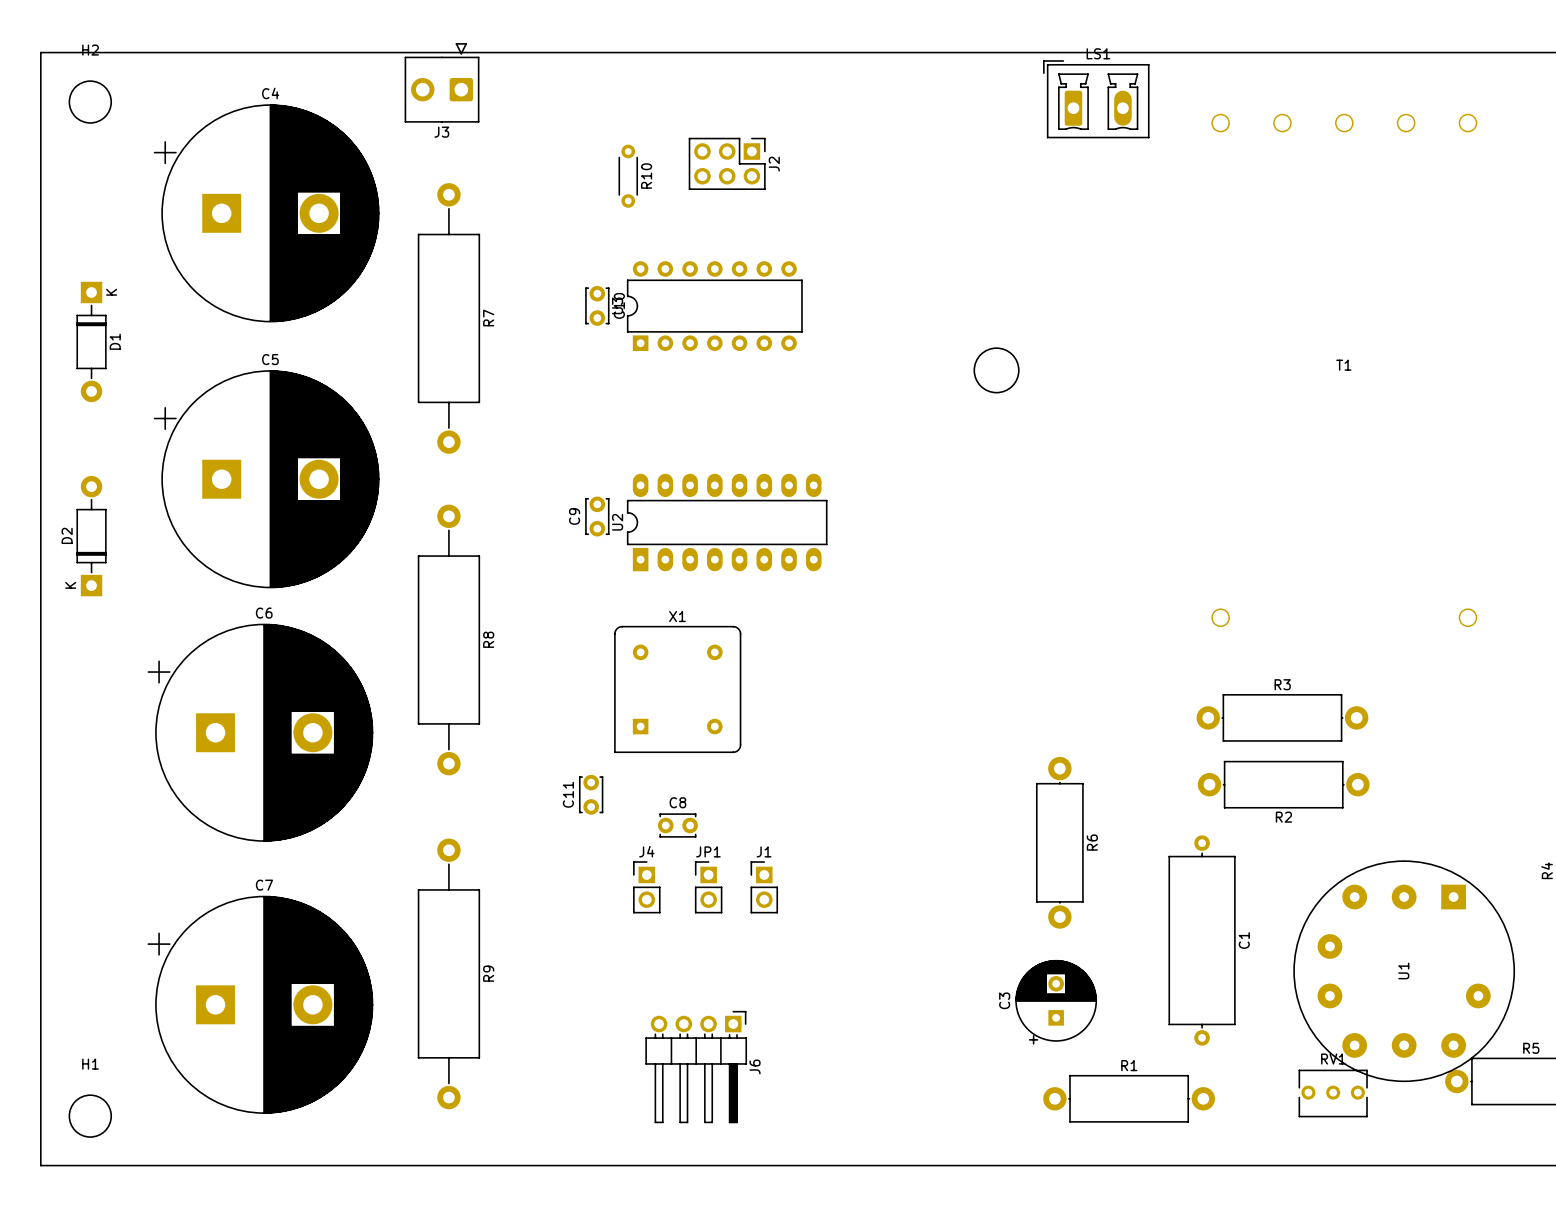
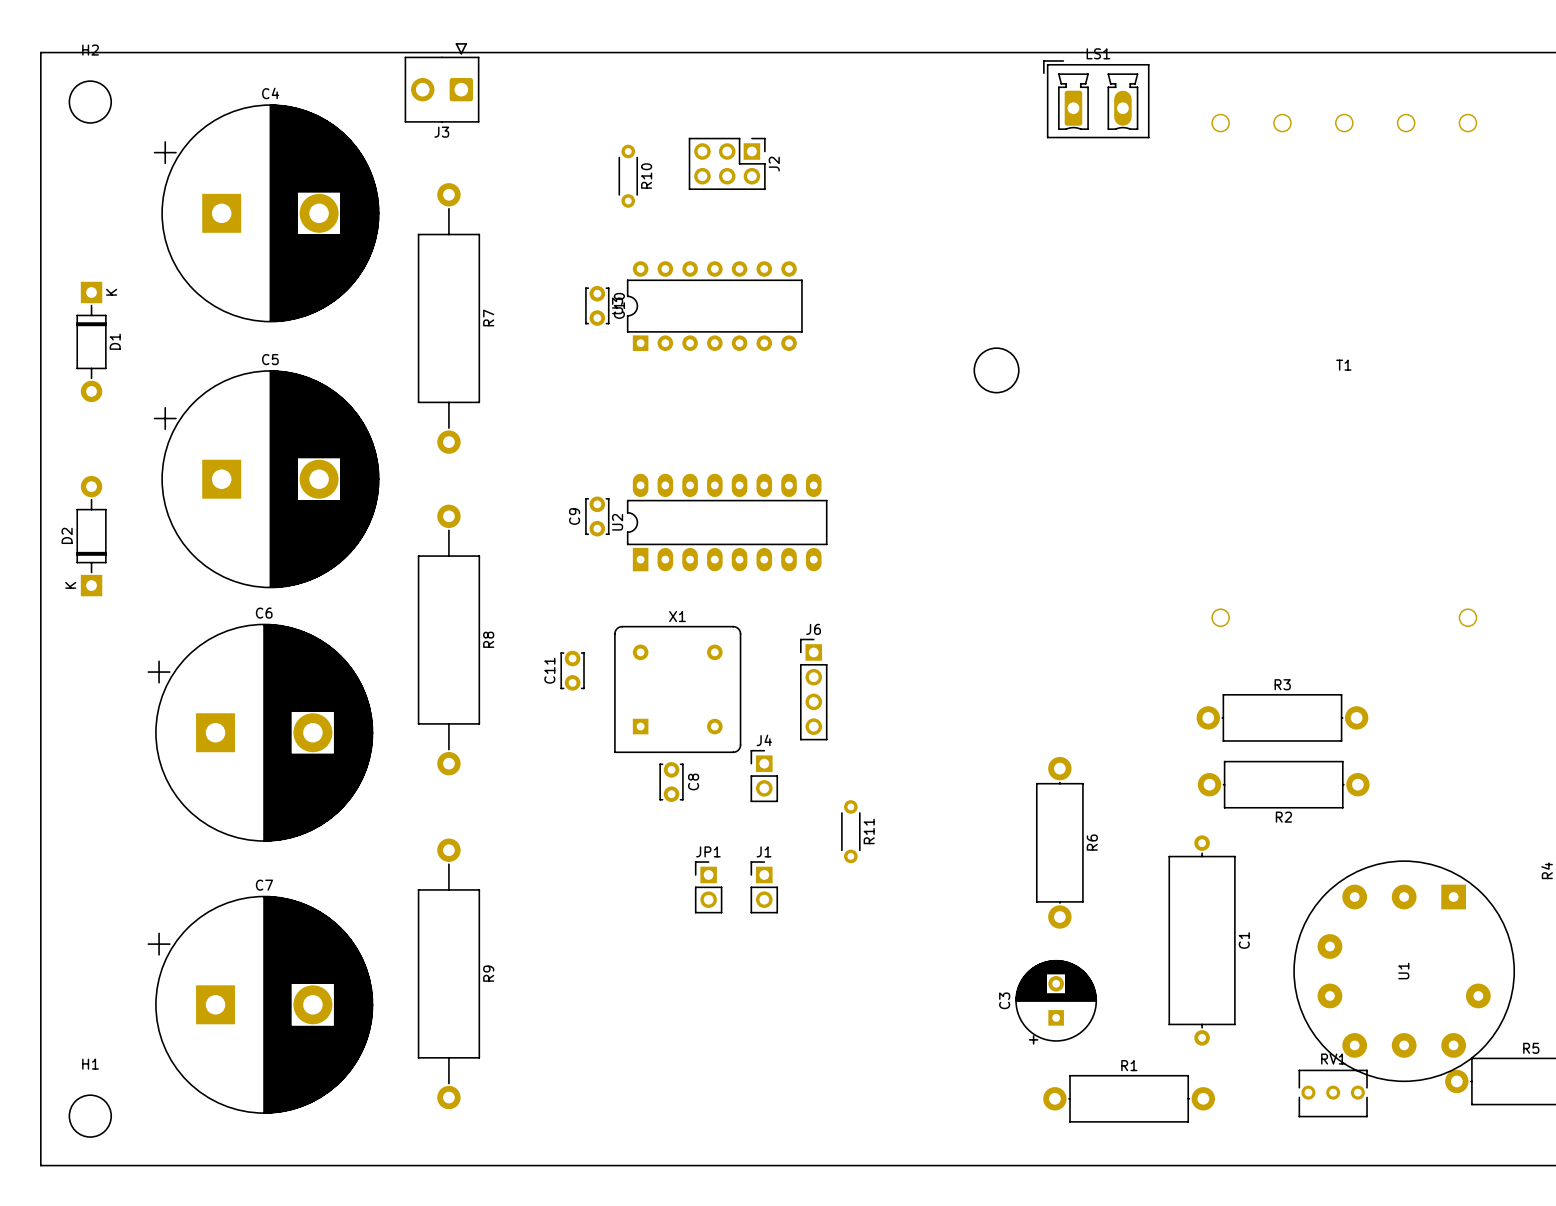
C11 position: (591, 794) -> (572, 670)
C8 rotation: 0° (677, 825) -> 90° clockwise (671, 782)
C8 position: (677, 825) -> (671, 782)
R11: none -> (850, 831)
J4 position: (646, 887) -> (764, 776)
J6 footprint: [645, 1011, 747, 1123] -> [800, 638, 828, 741]
J6 name position: J6 (755, 1066) -> J6 (813, 629)

